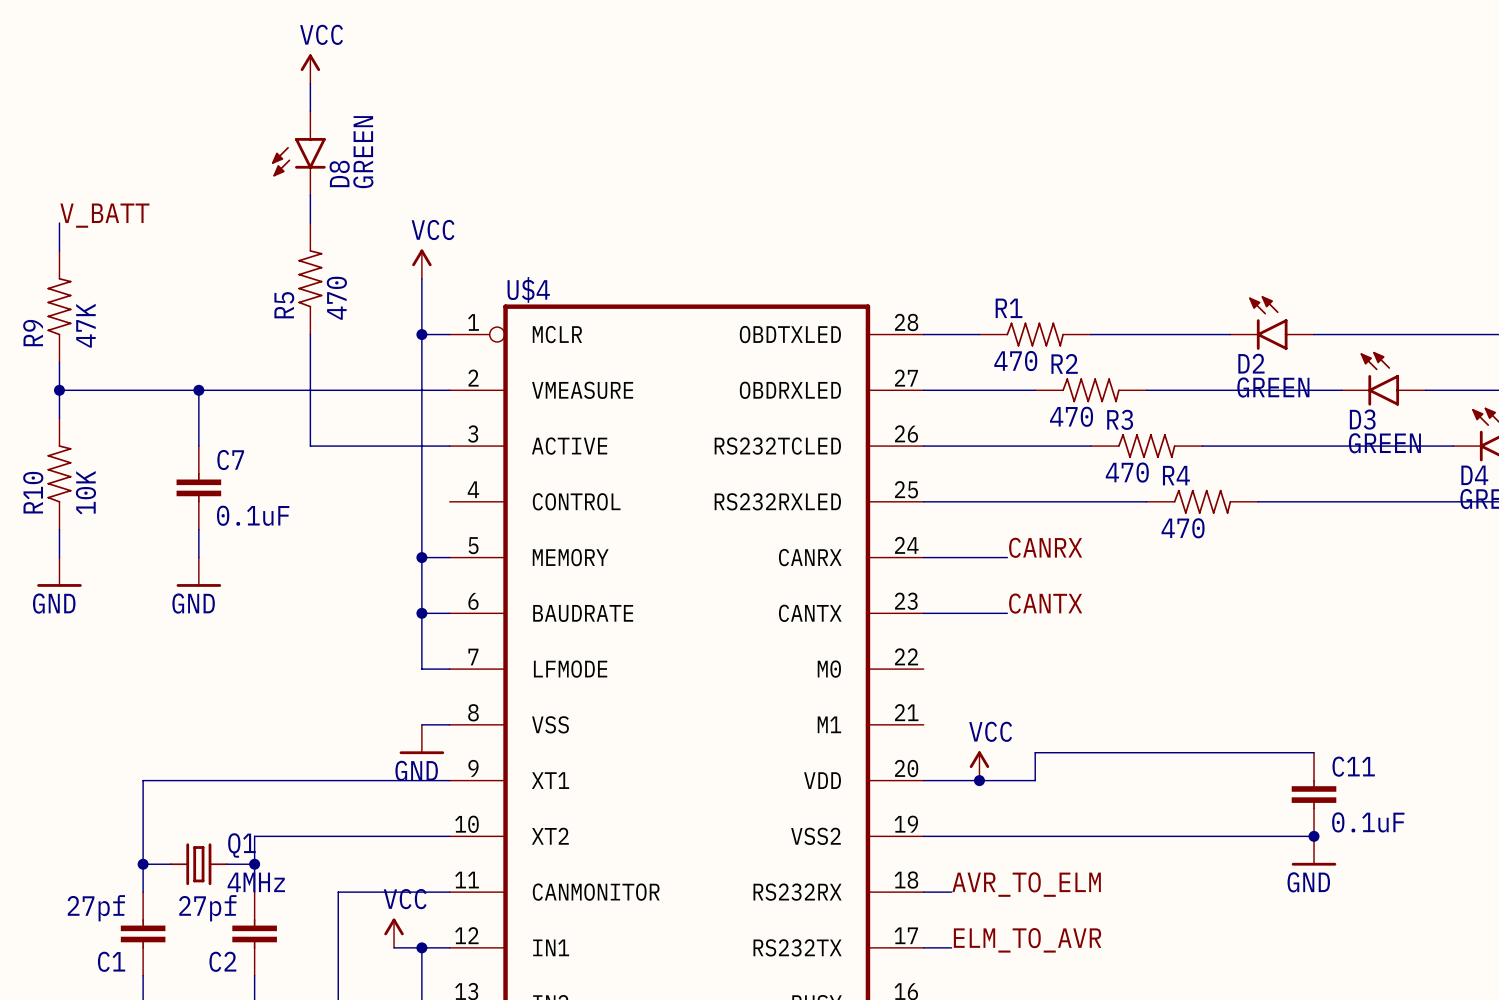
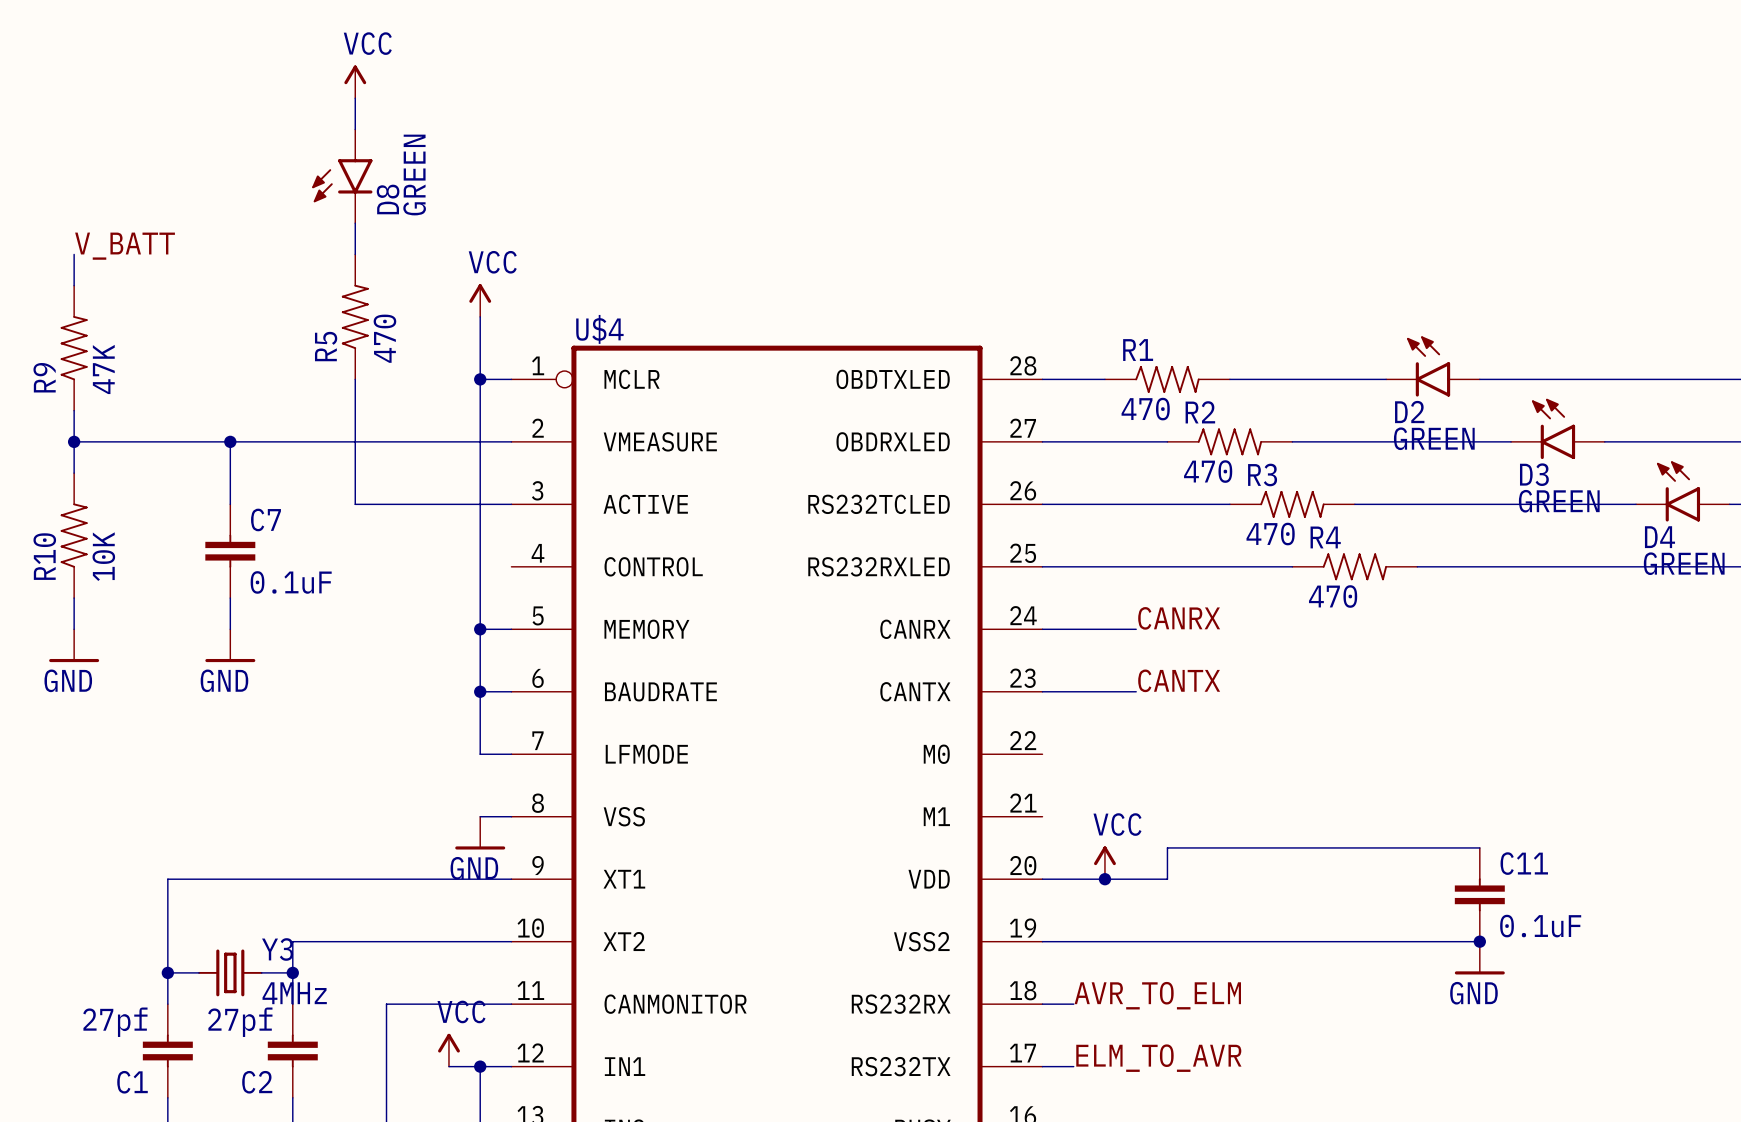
Q1 name: Q1 (241, 845) -> Y3 (277, 949)

